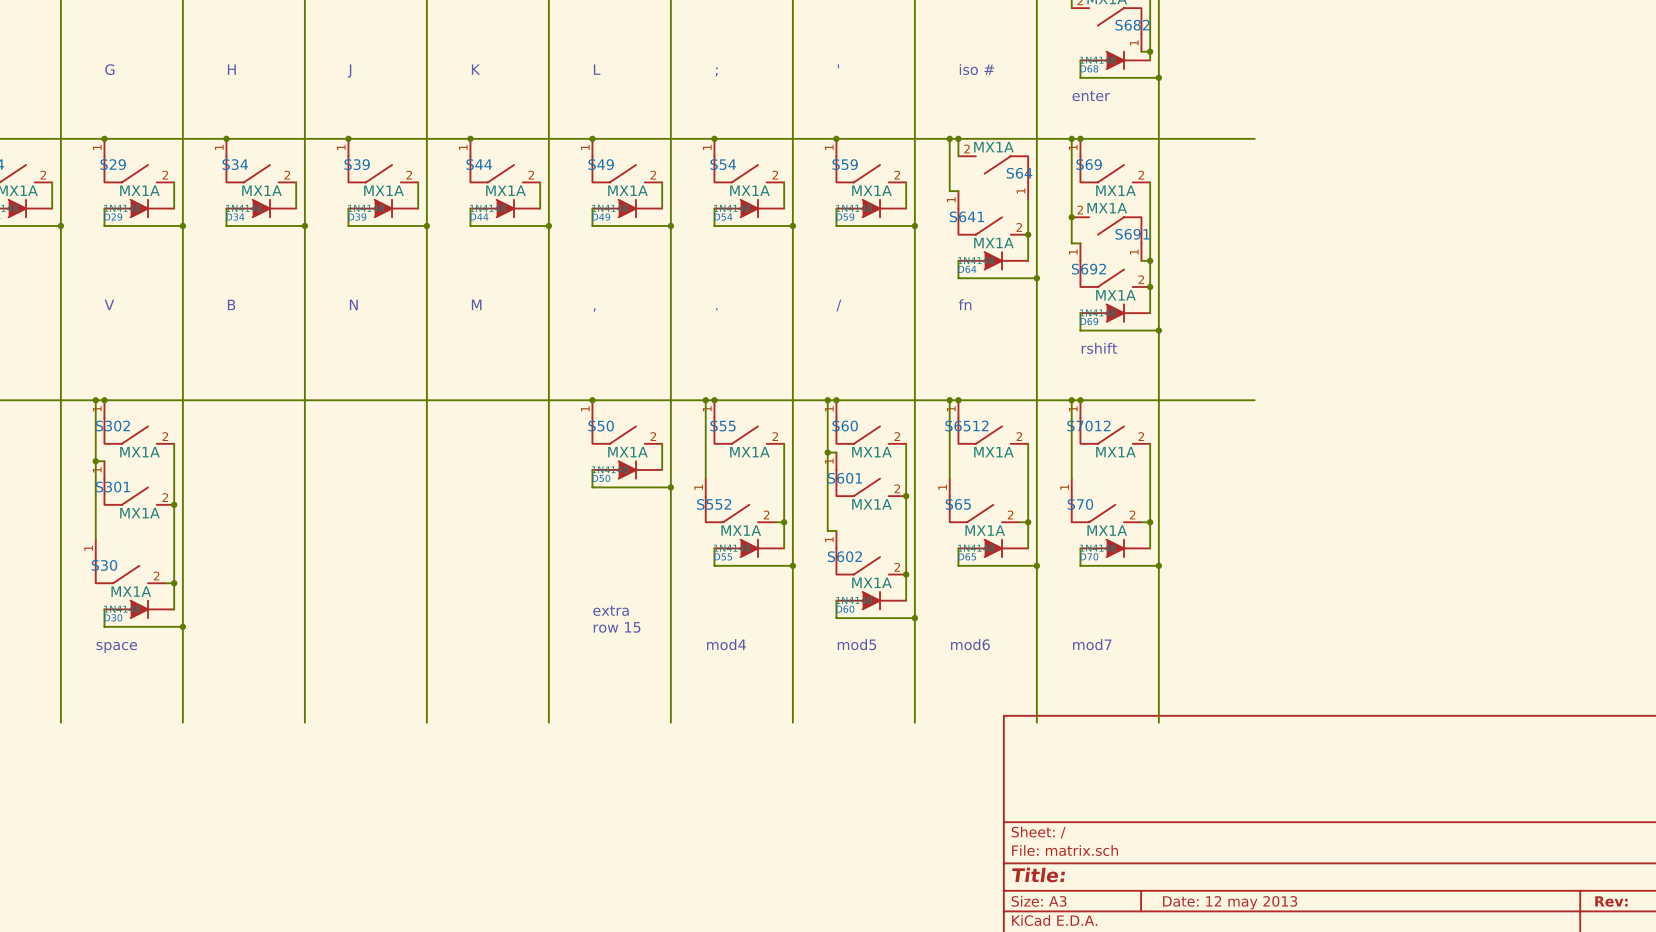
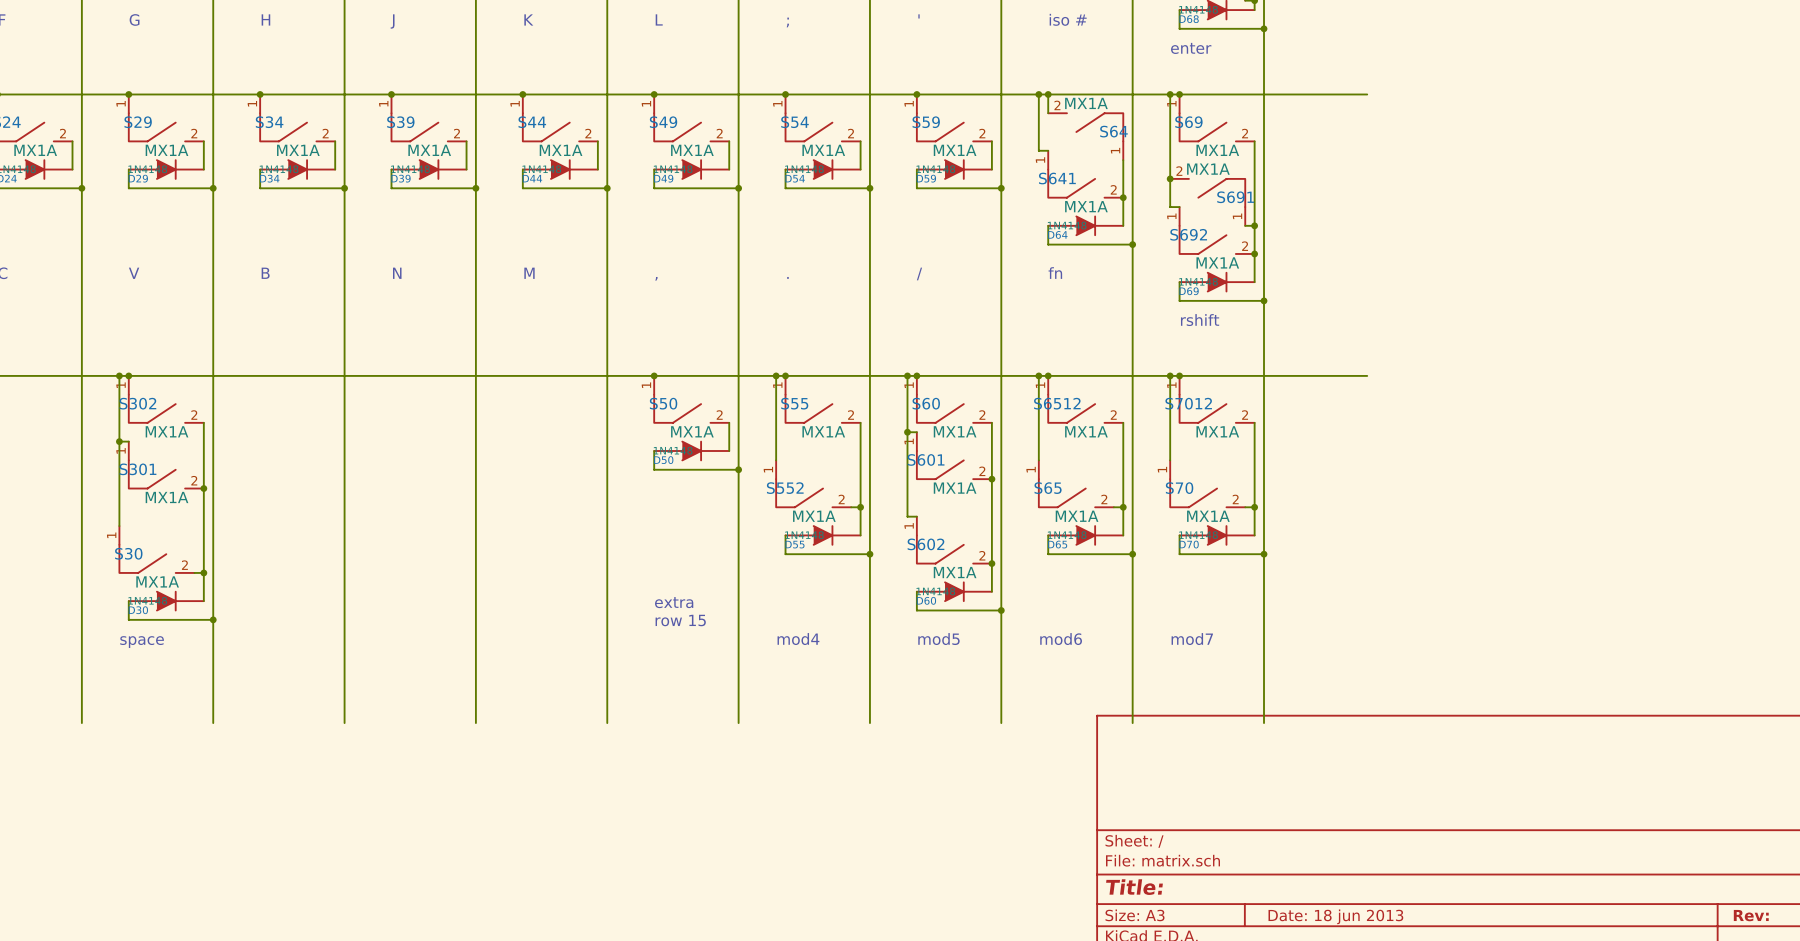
title block: Date: 12 may 2013 (1230, 902) -> Date: 18 jun 2013 (1335, 916)

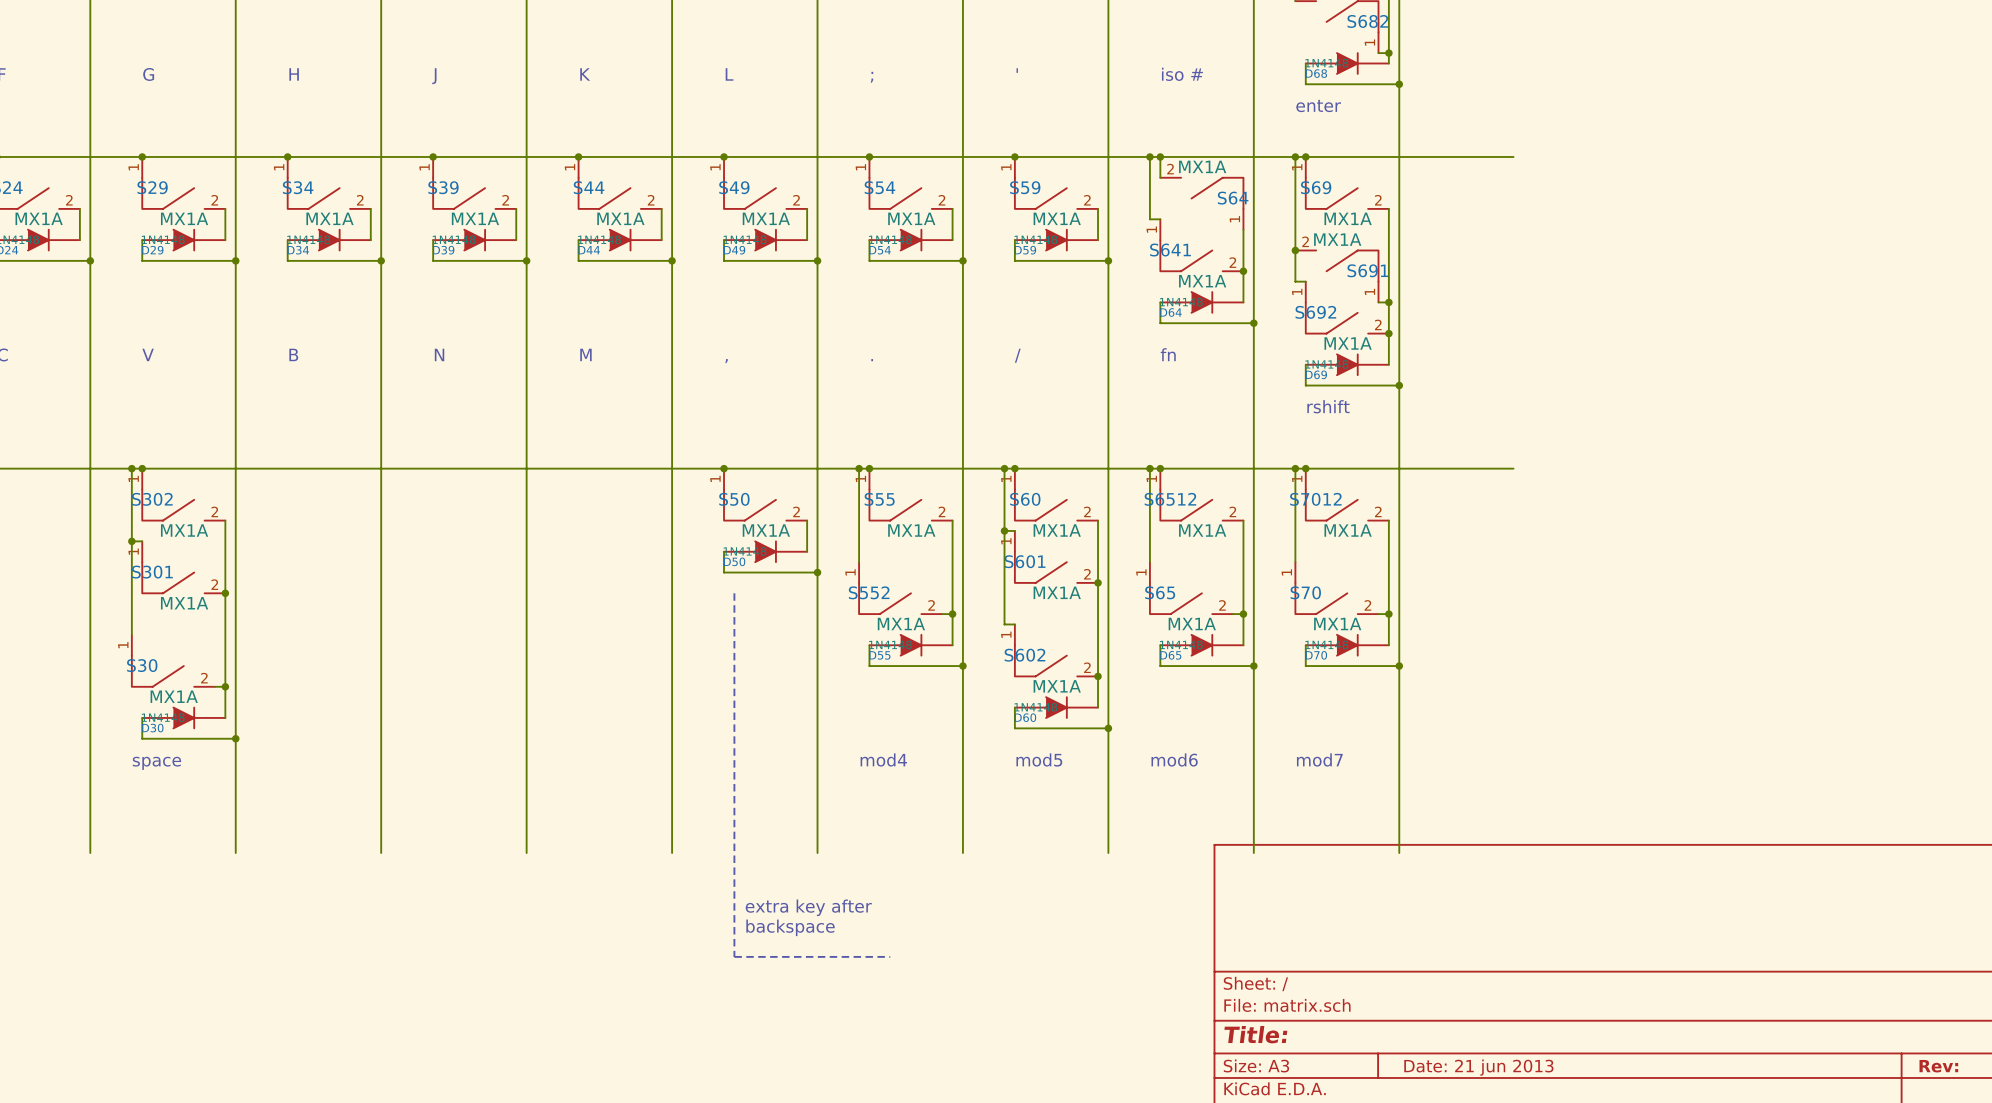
line: none -> (734, 593) (734, 956) (890, 956)
text: extra (674, 602) -> none
text: row 15 (680, 620) -> none
text: none -> extra key after (808, 907)
text: none -> backspace (790, 927)
title block: Date: 18 jun 2013 (1335, 916) -> Date: 21 jun 2013 (1478, 1067)

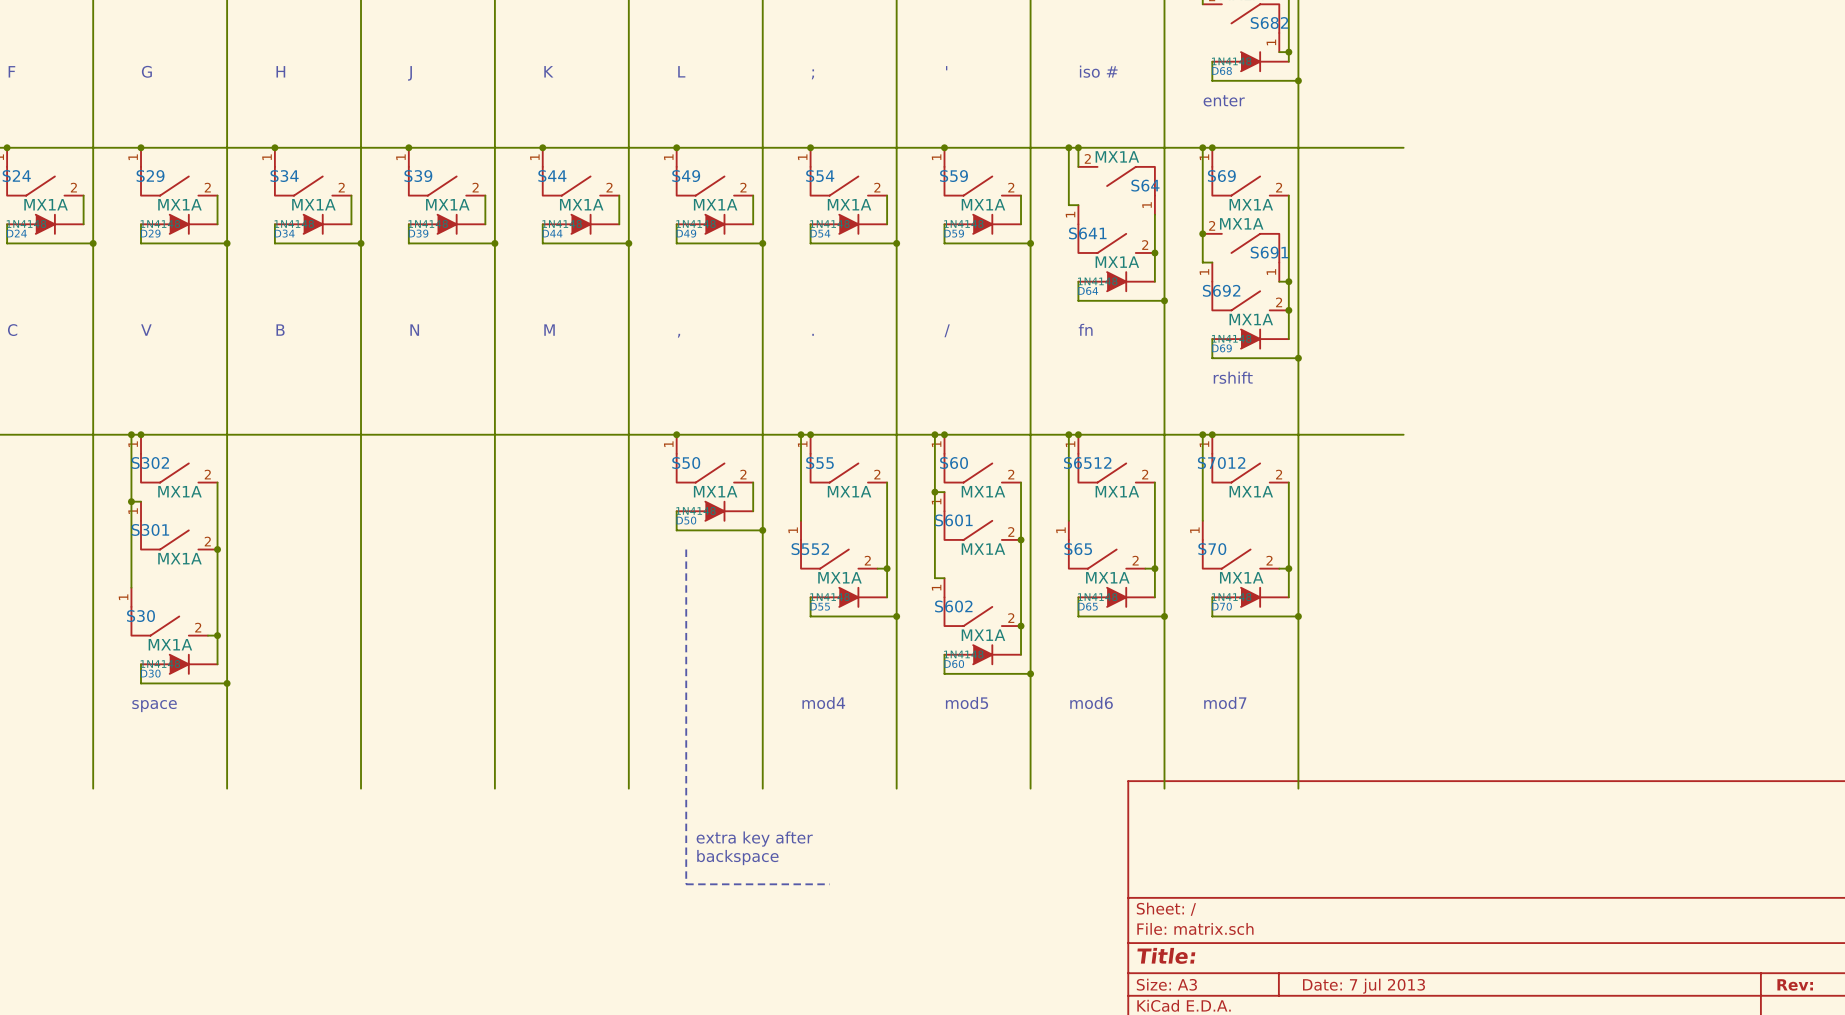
title block: Date: 21 jun 2013 (1478, 1067) -> Date: 7 jul 2013 (1364, 986)

